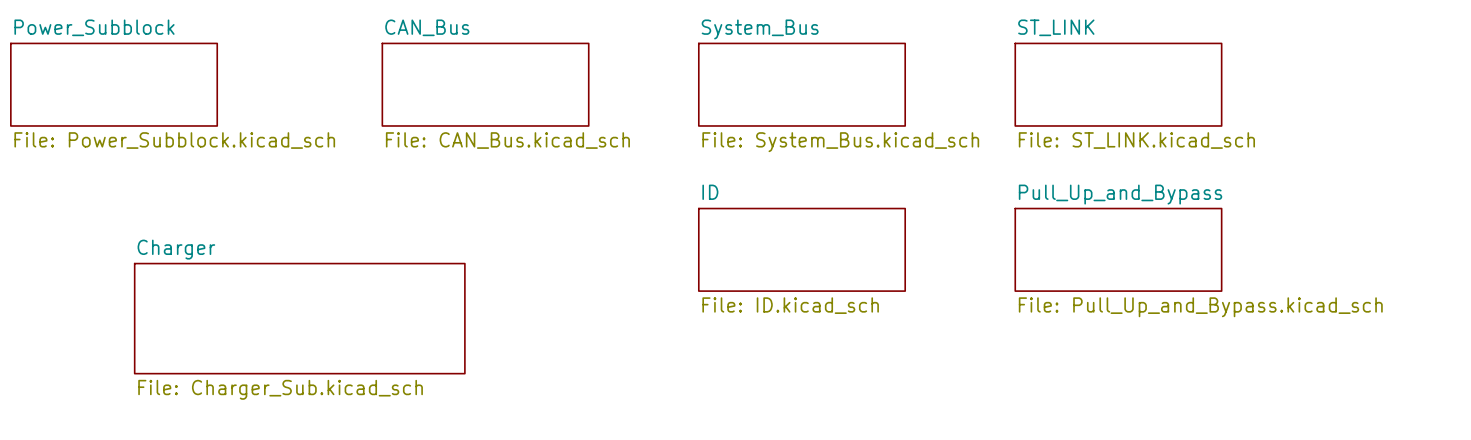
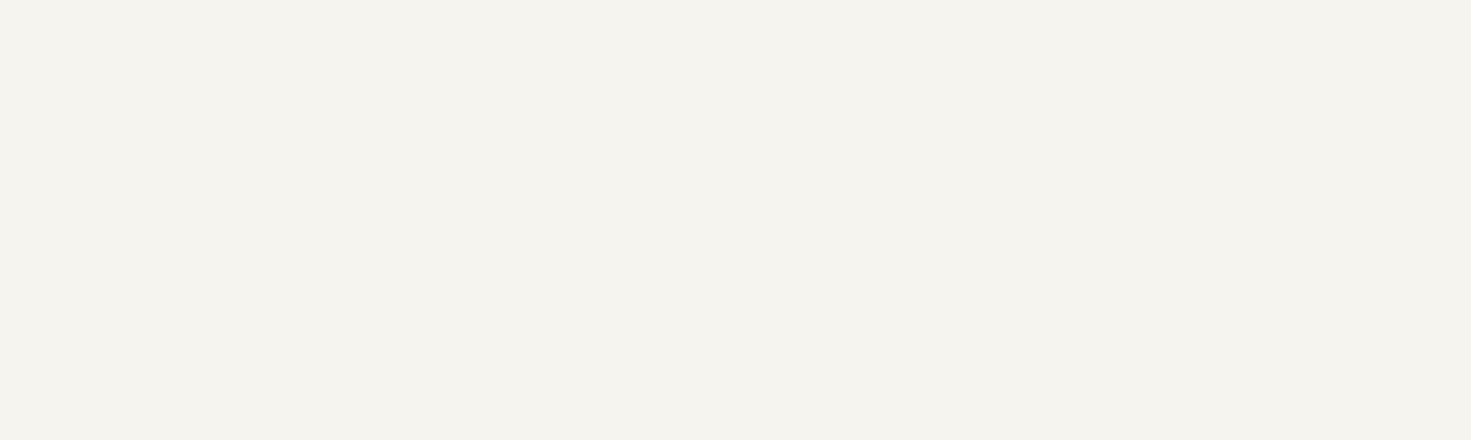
sheet Power_Subblock: File: Power_Subblock.kicad_sch (114, 84) -> none
sheet CAN_Bus: File: CAN_Bus.kicad_sch (485, 84) -> none
sheet System_Bus: File: System_Bus.kicad_sch (801, 84) -> none
sheet ST_LINK: File: ST_LINK.kicad_sch (1118, 84) -> none
sheet ID: File: ID.kicad_sch (801, 249) -> none
sheet Pull_Up_and_Bypass: File: Pull_Up_and_Bypass.kicad_sch (1118, 249) -> none
sheet Charger: File: Charger_Sub.kicad_sch (299, 318) -> none

